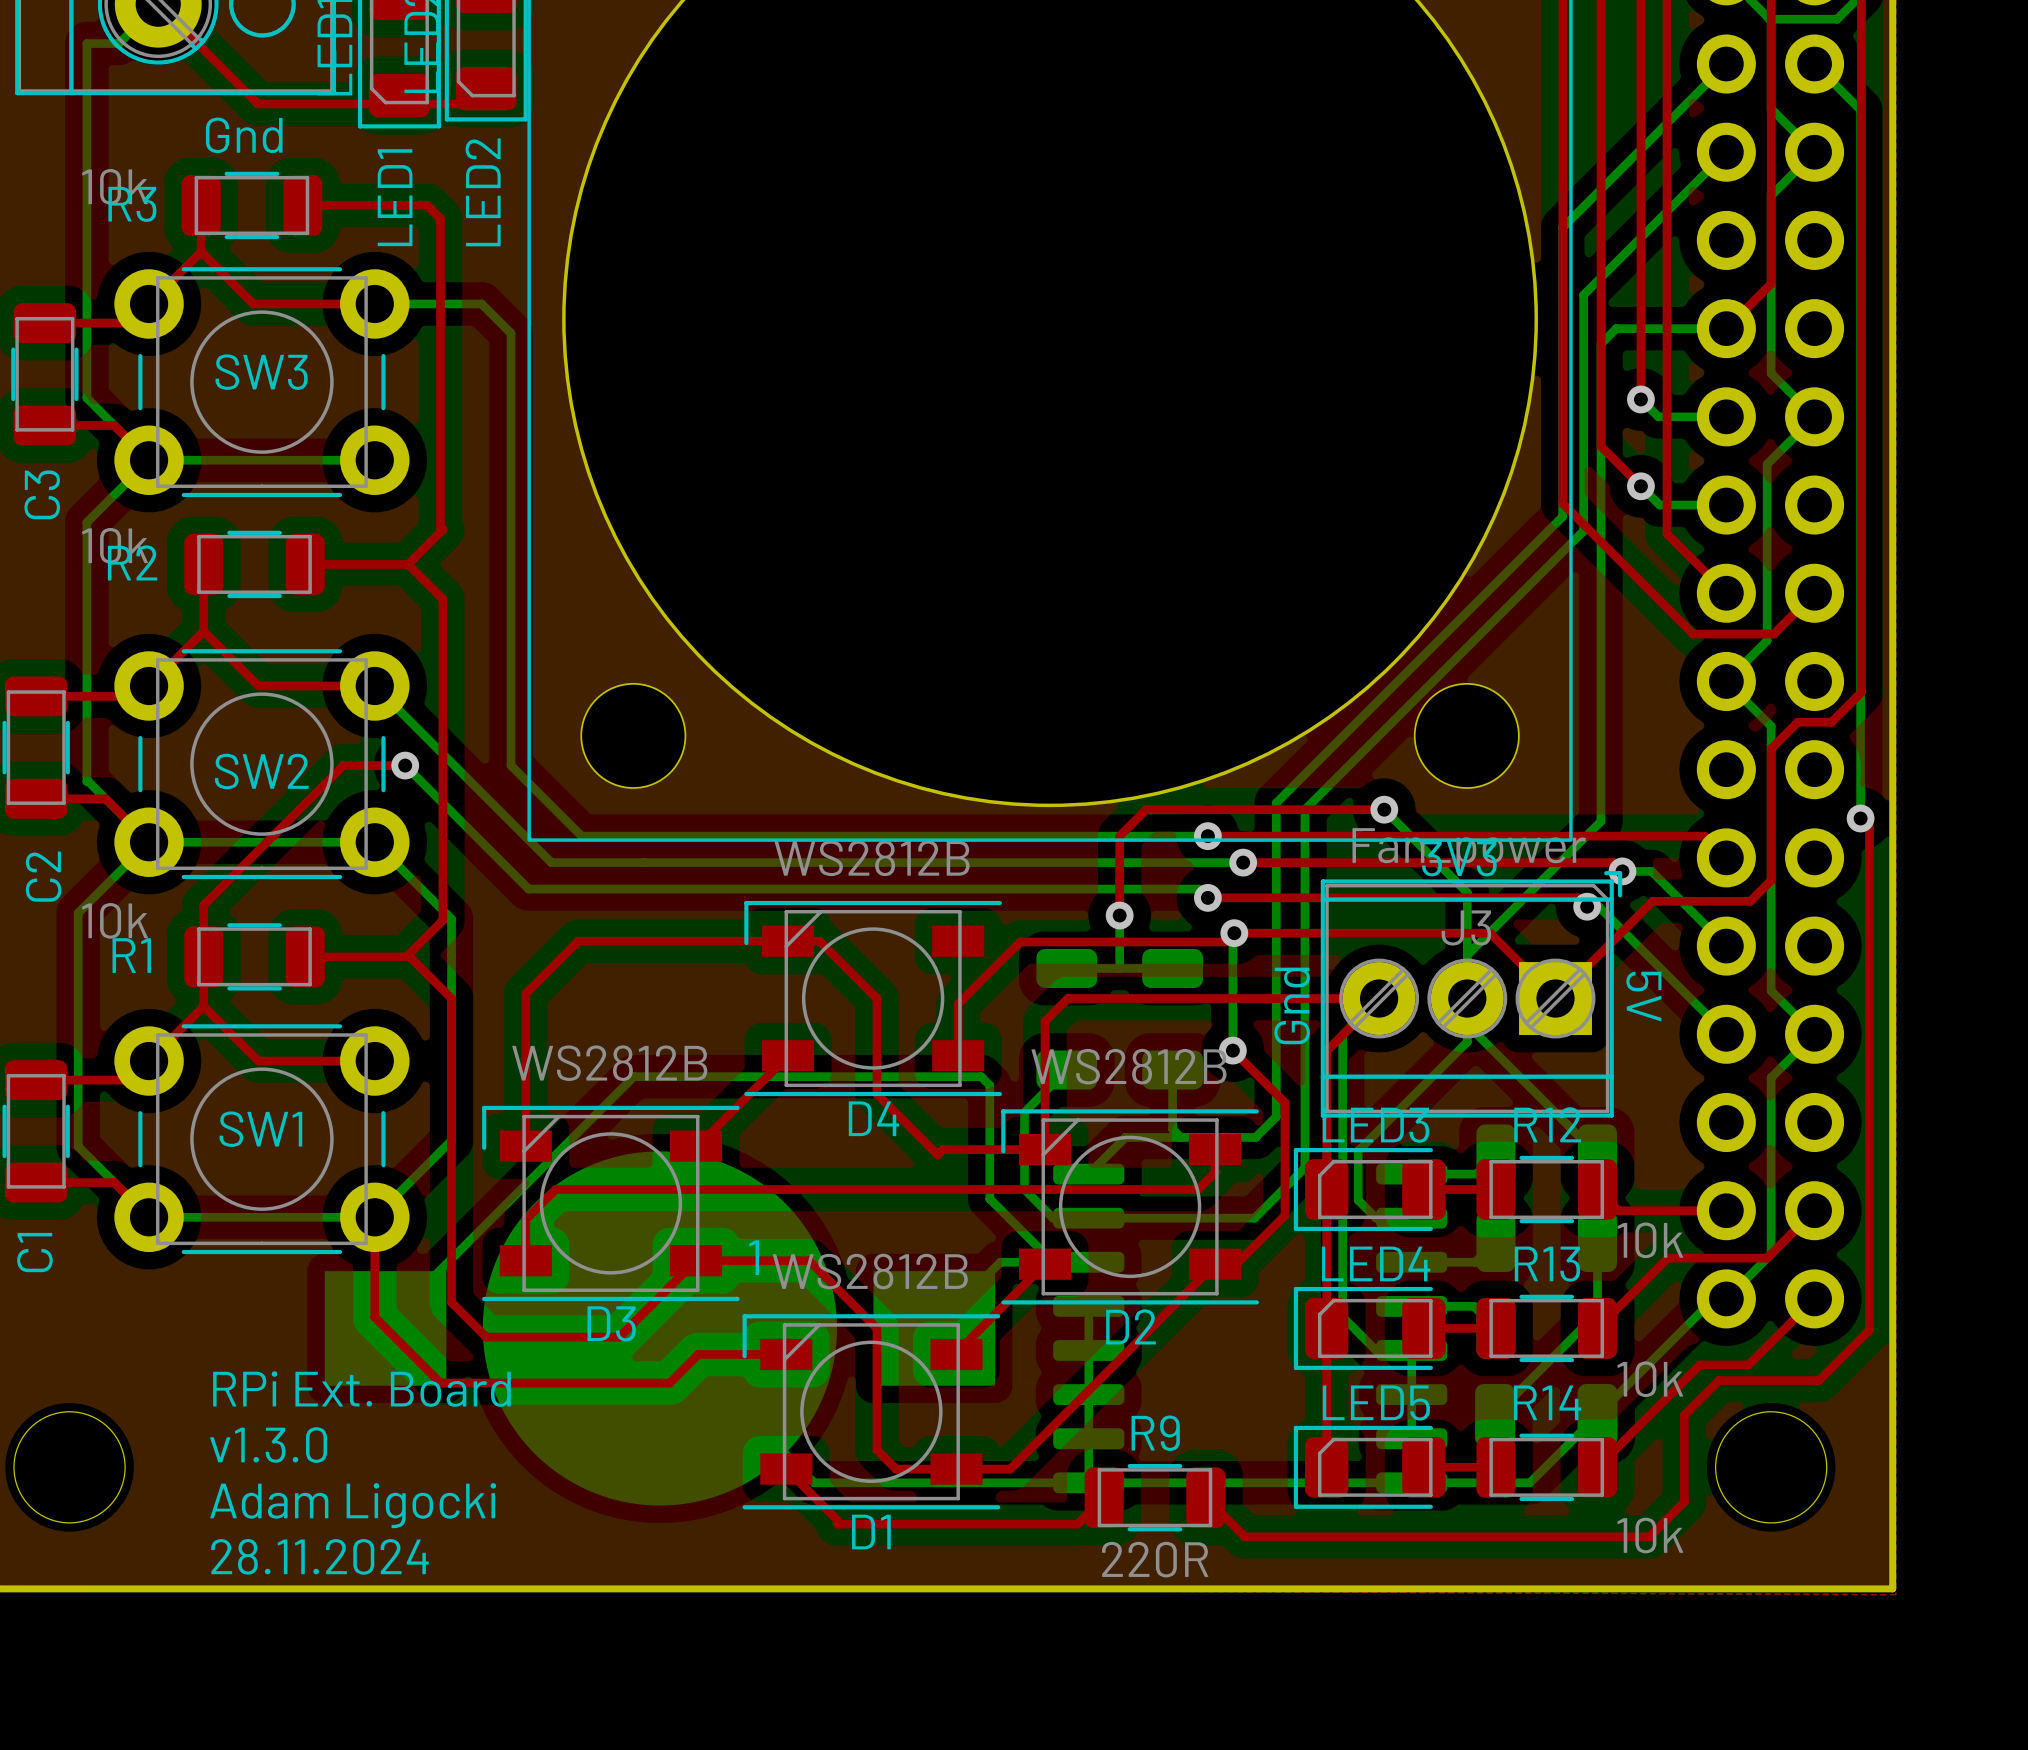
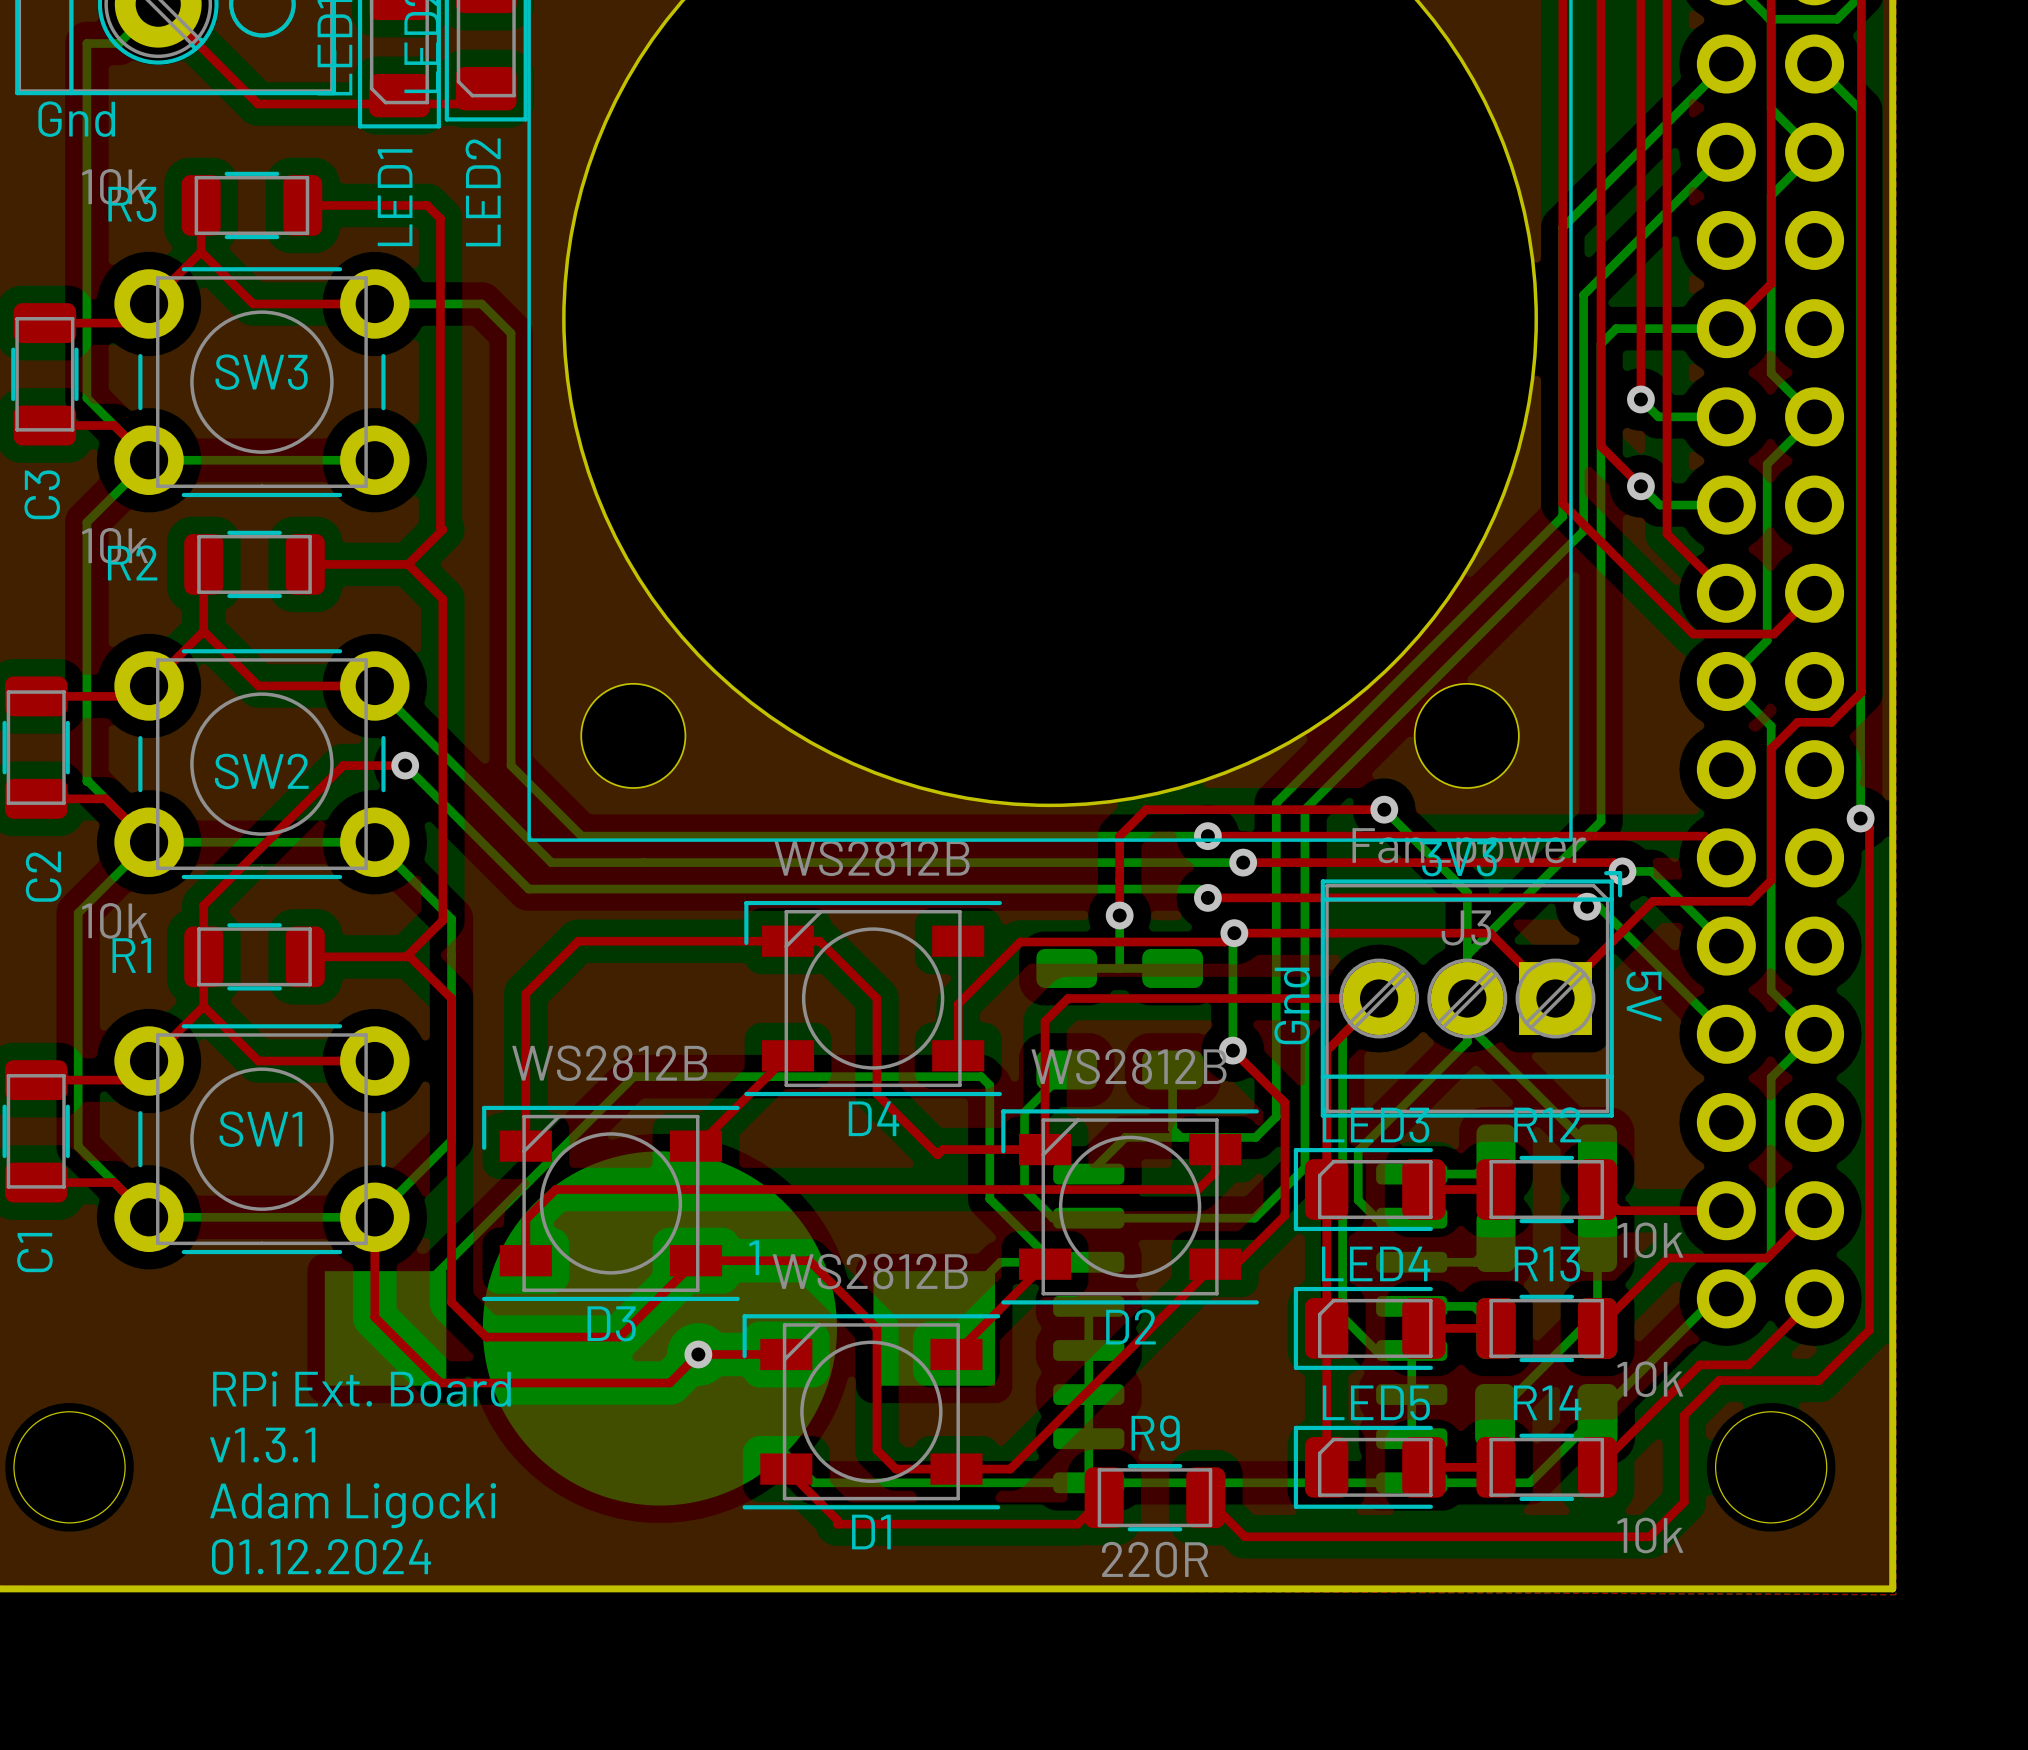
text position: Gnd (244, 135) -> Gnd (76, 119)
via: none -> (698, 1354)
text: v1.3.0 (268, 1445) -> v1.3.1 (262, 1445)
text: 28.11.2024 (319, 1556) -> 01.12.2024 (321, 1556)

